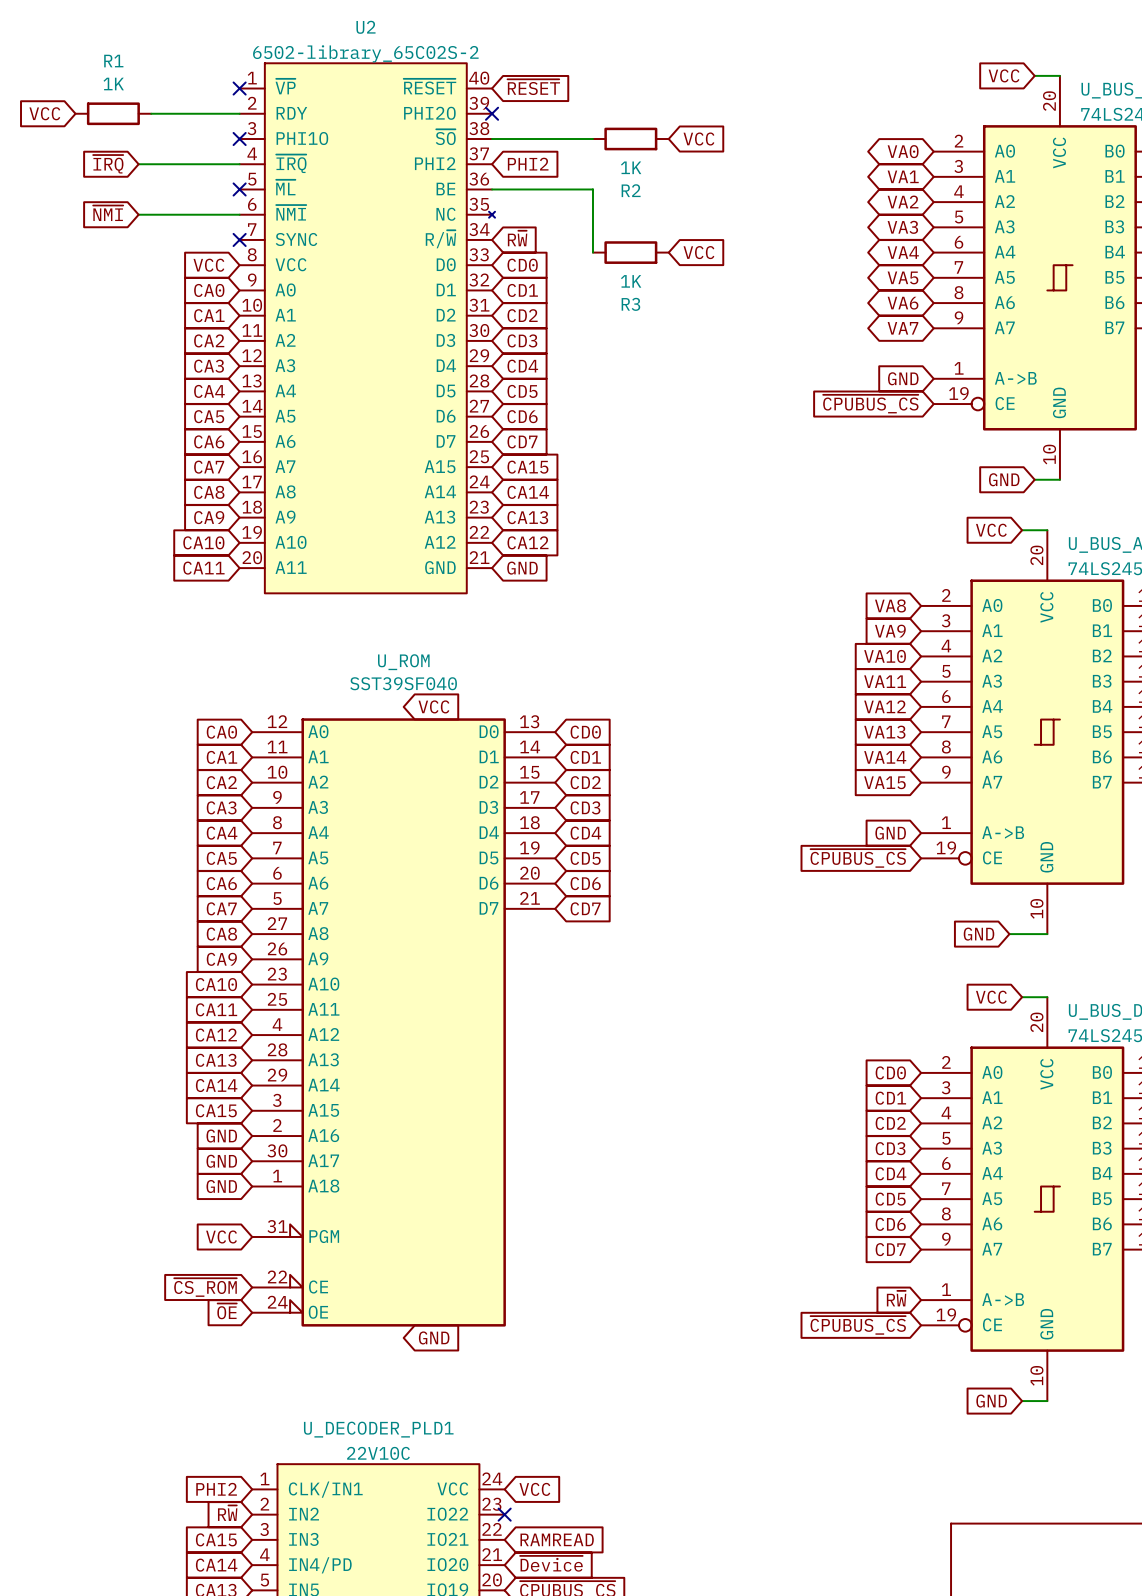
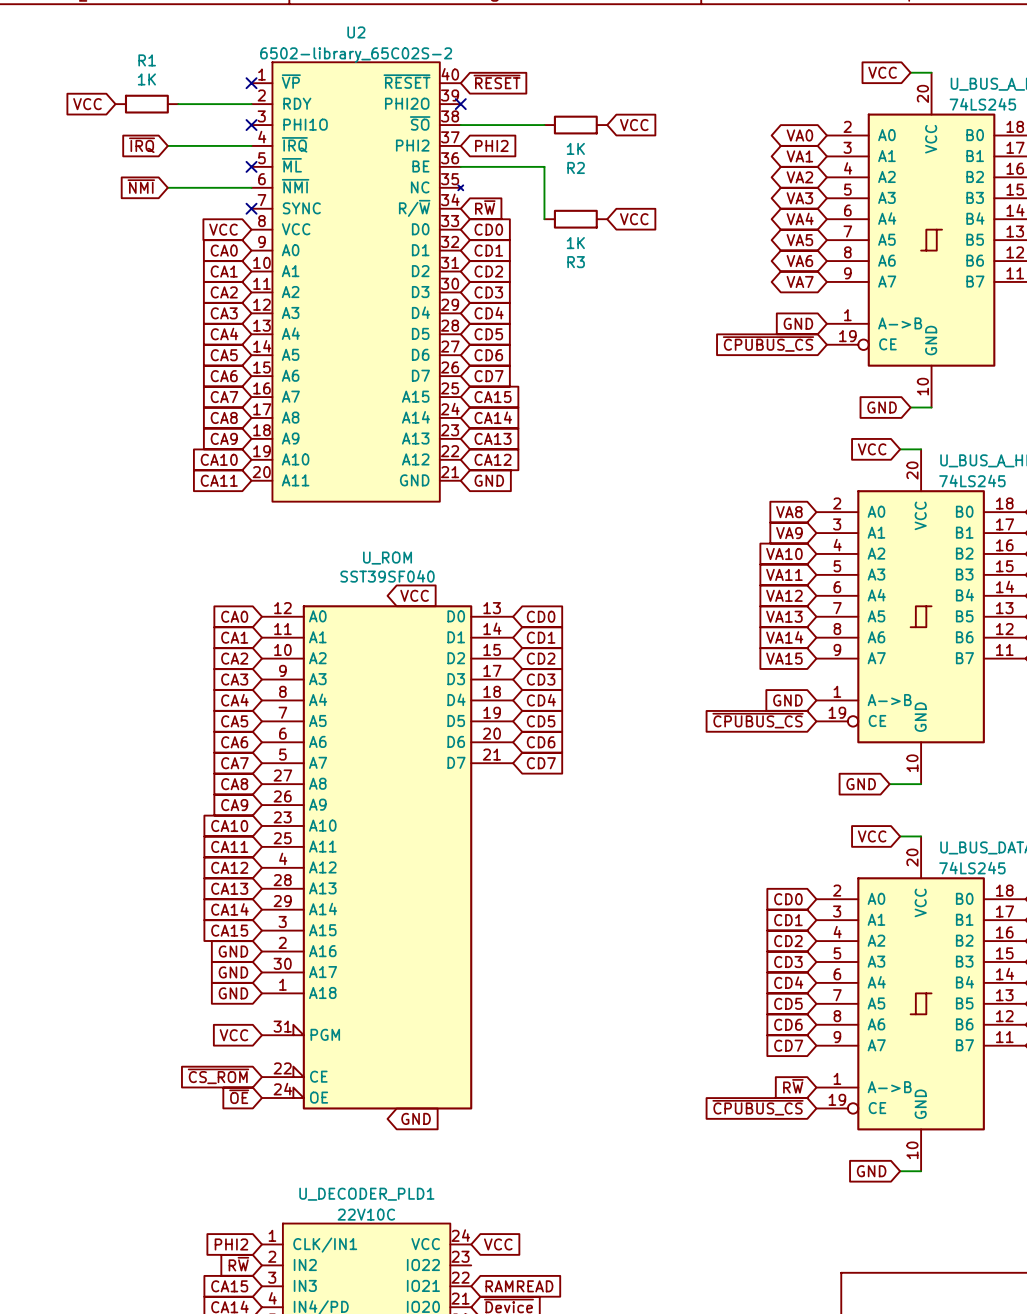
no-connect mark: (504, 1514) -> none

